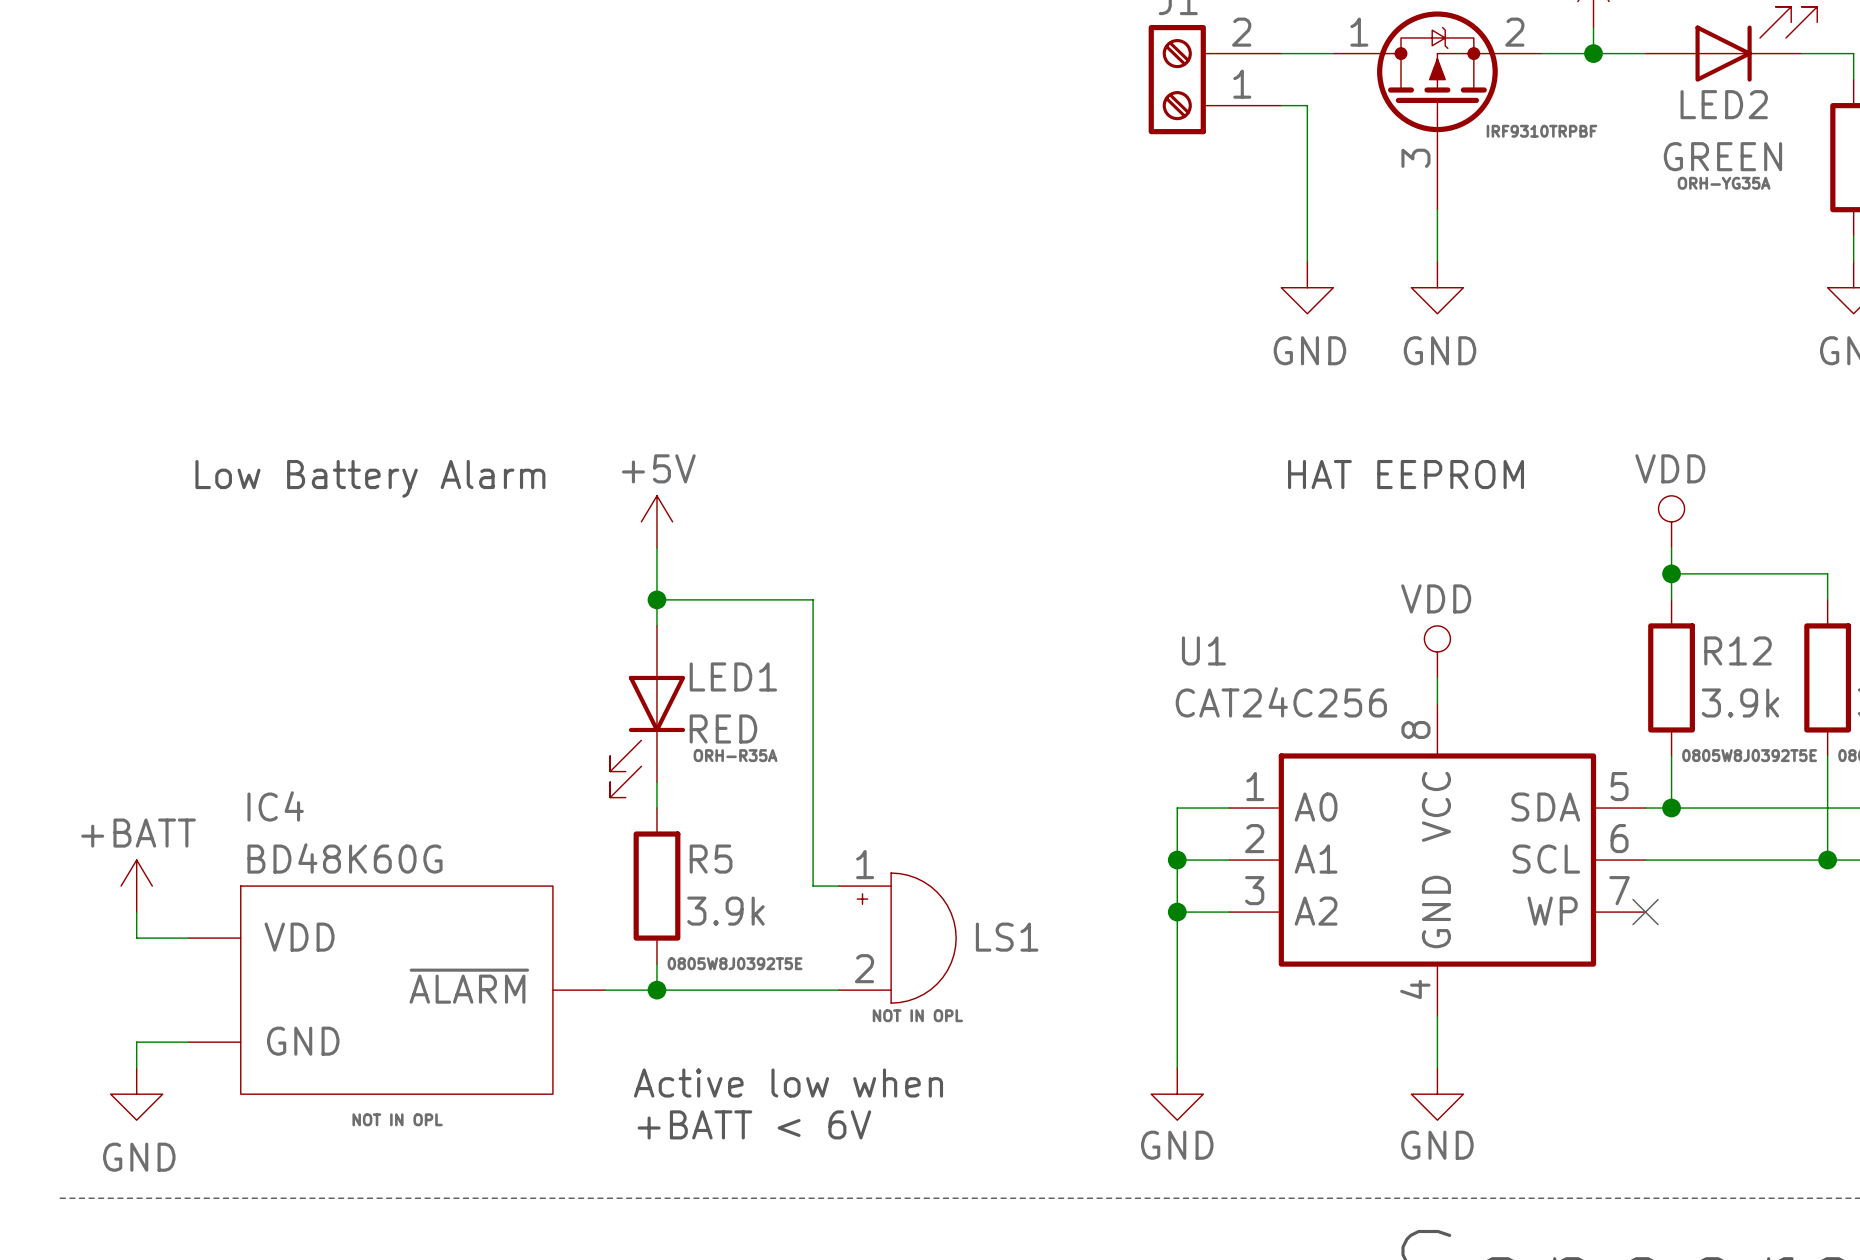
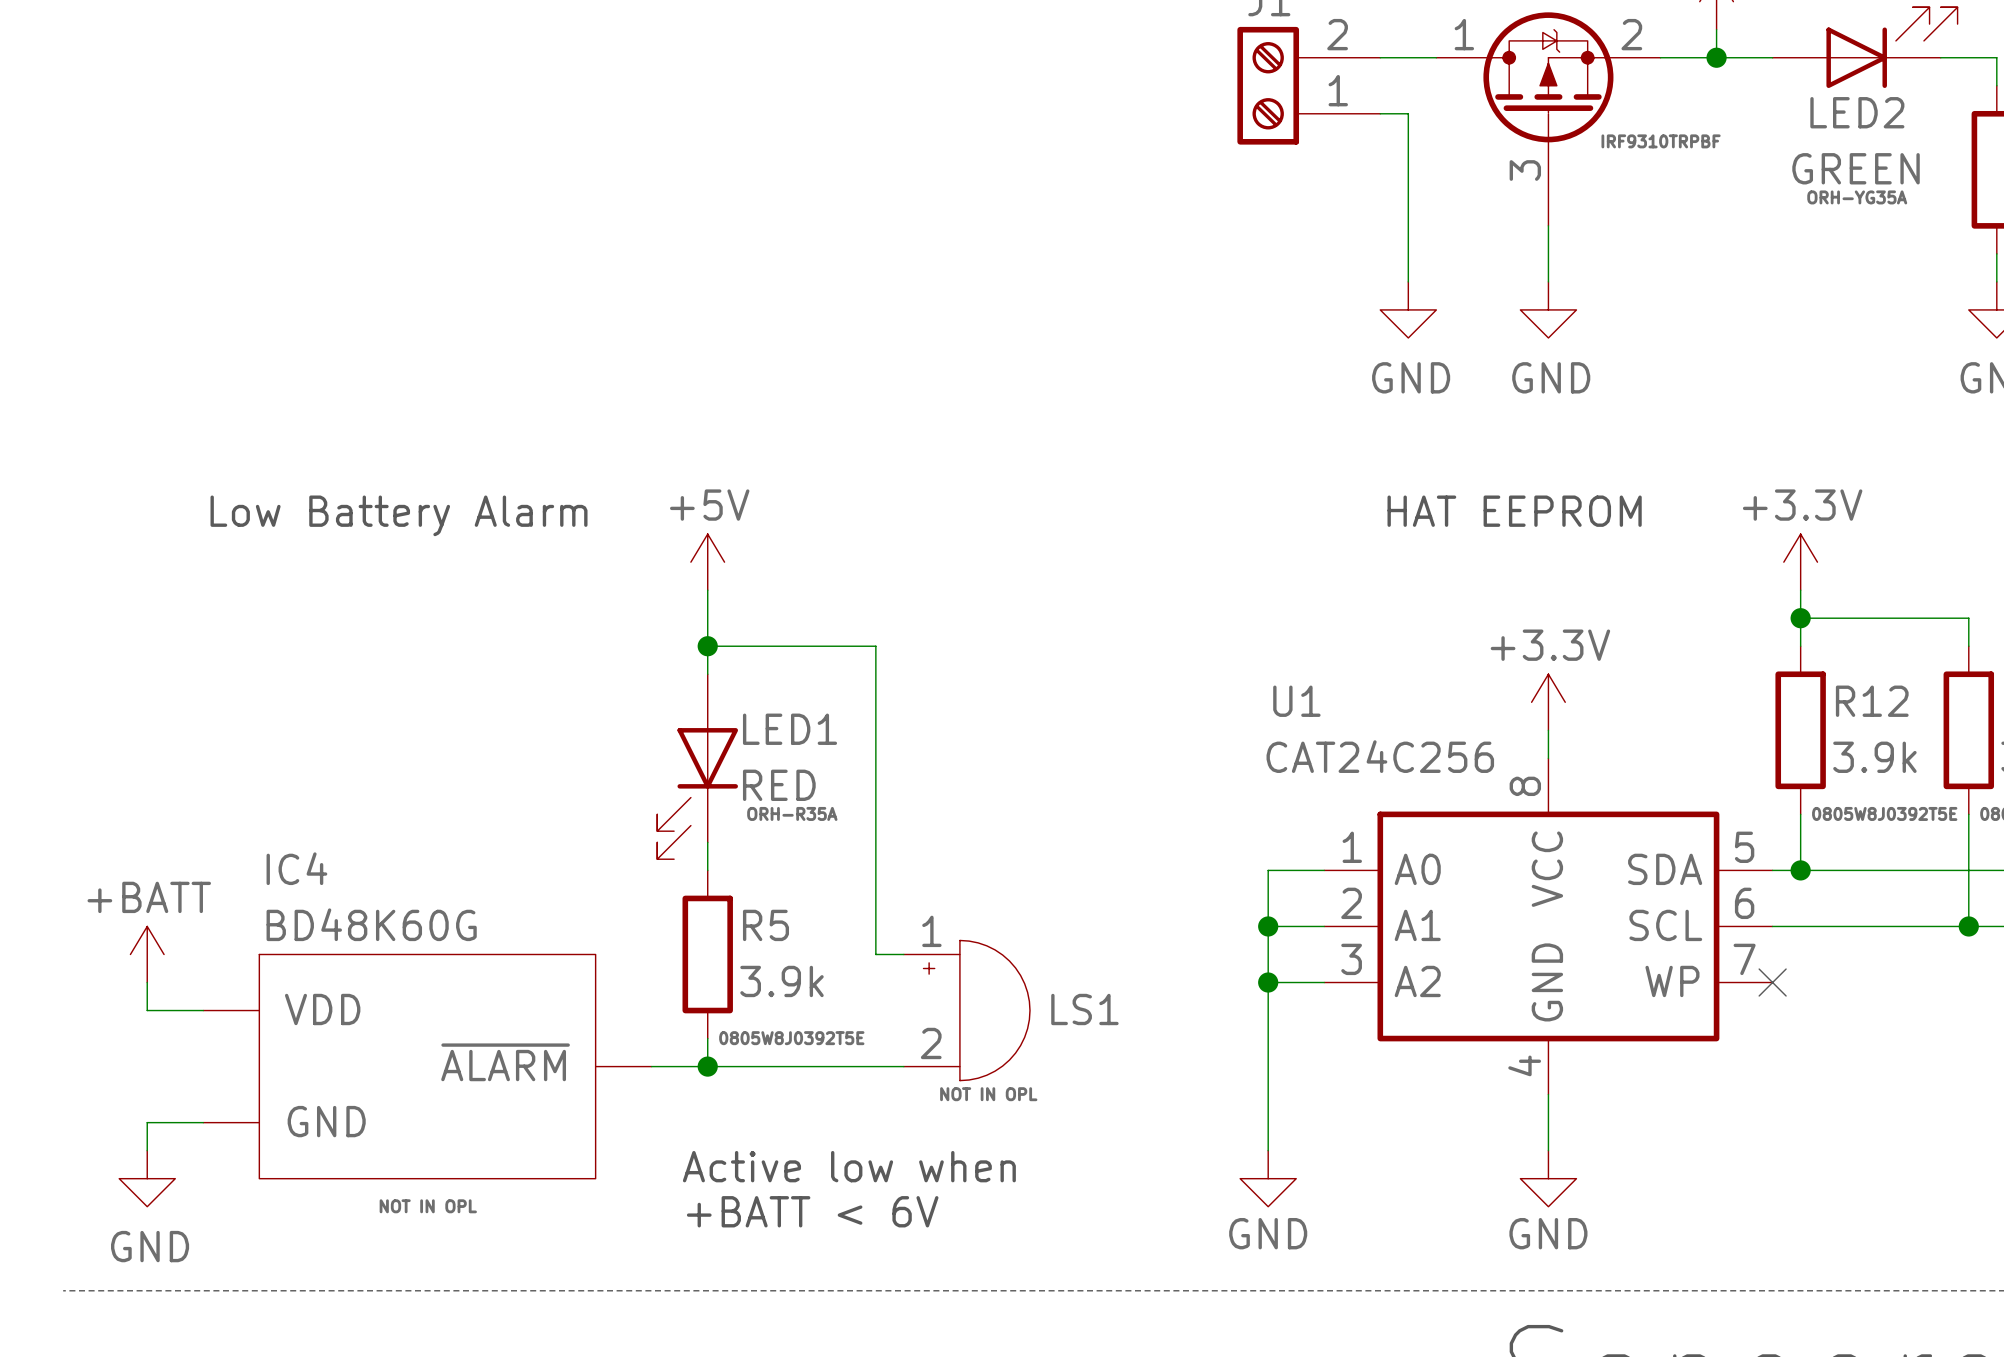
power symbol: VDD (1671, 521) -> +3.3V (1800, 562)
power symbol: VDD (1437, 651) -> +3.3V (1548, 702)

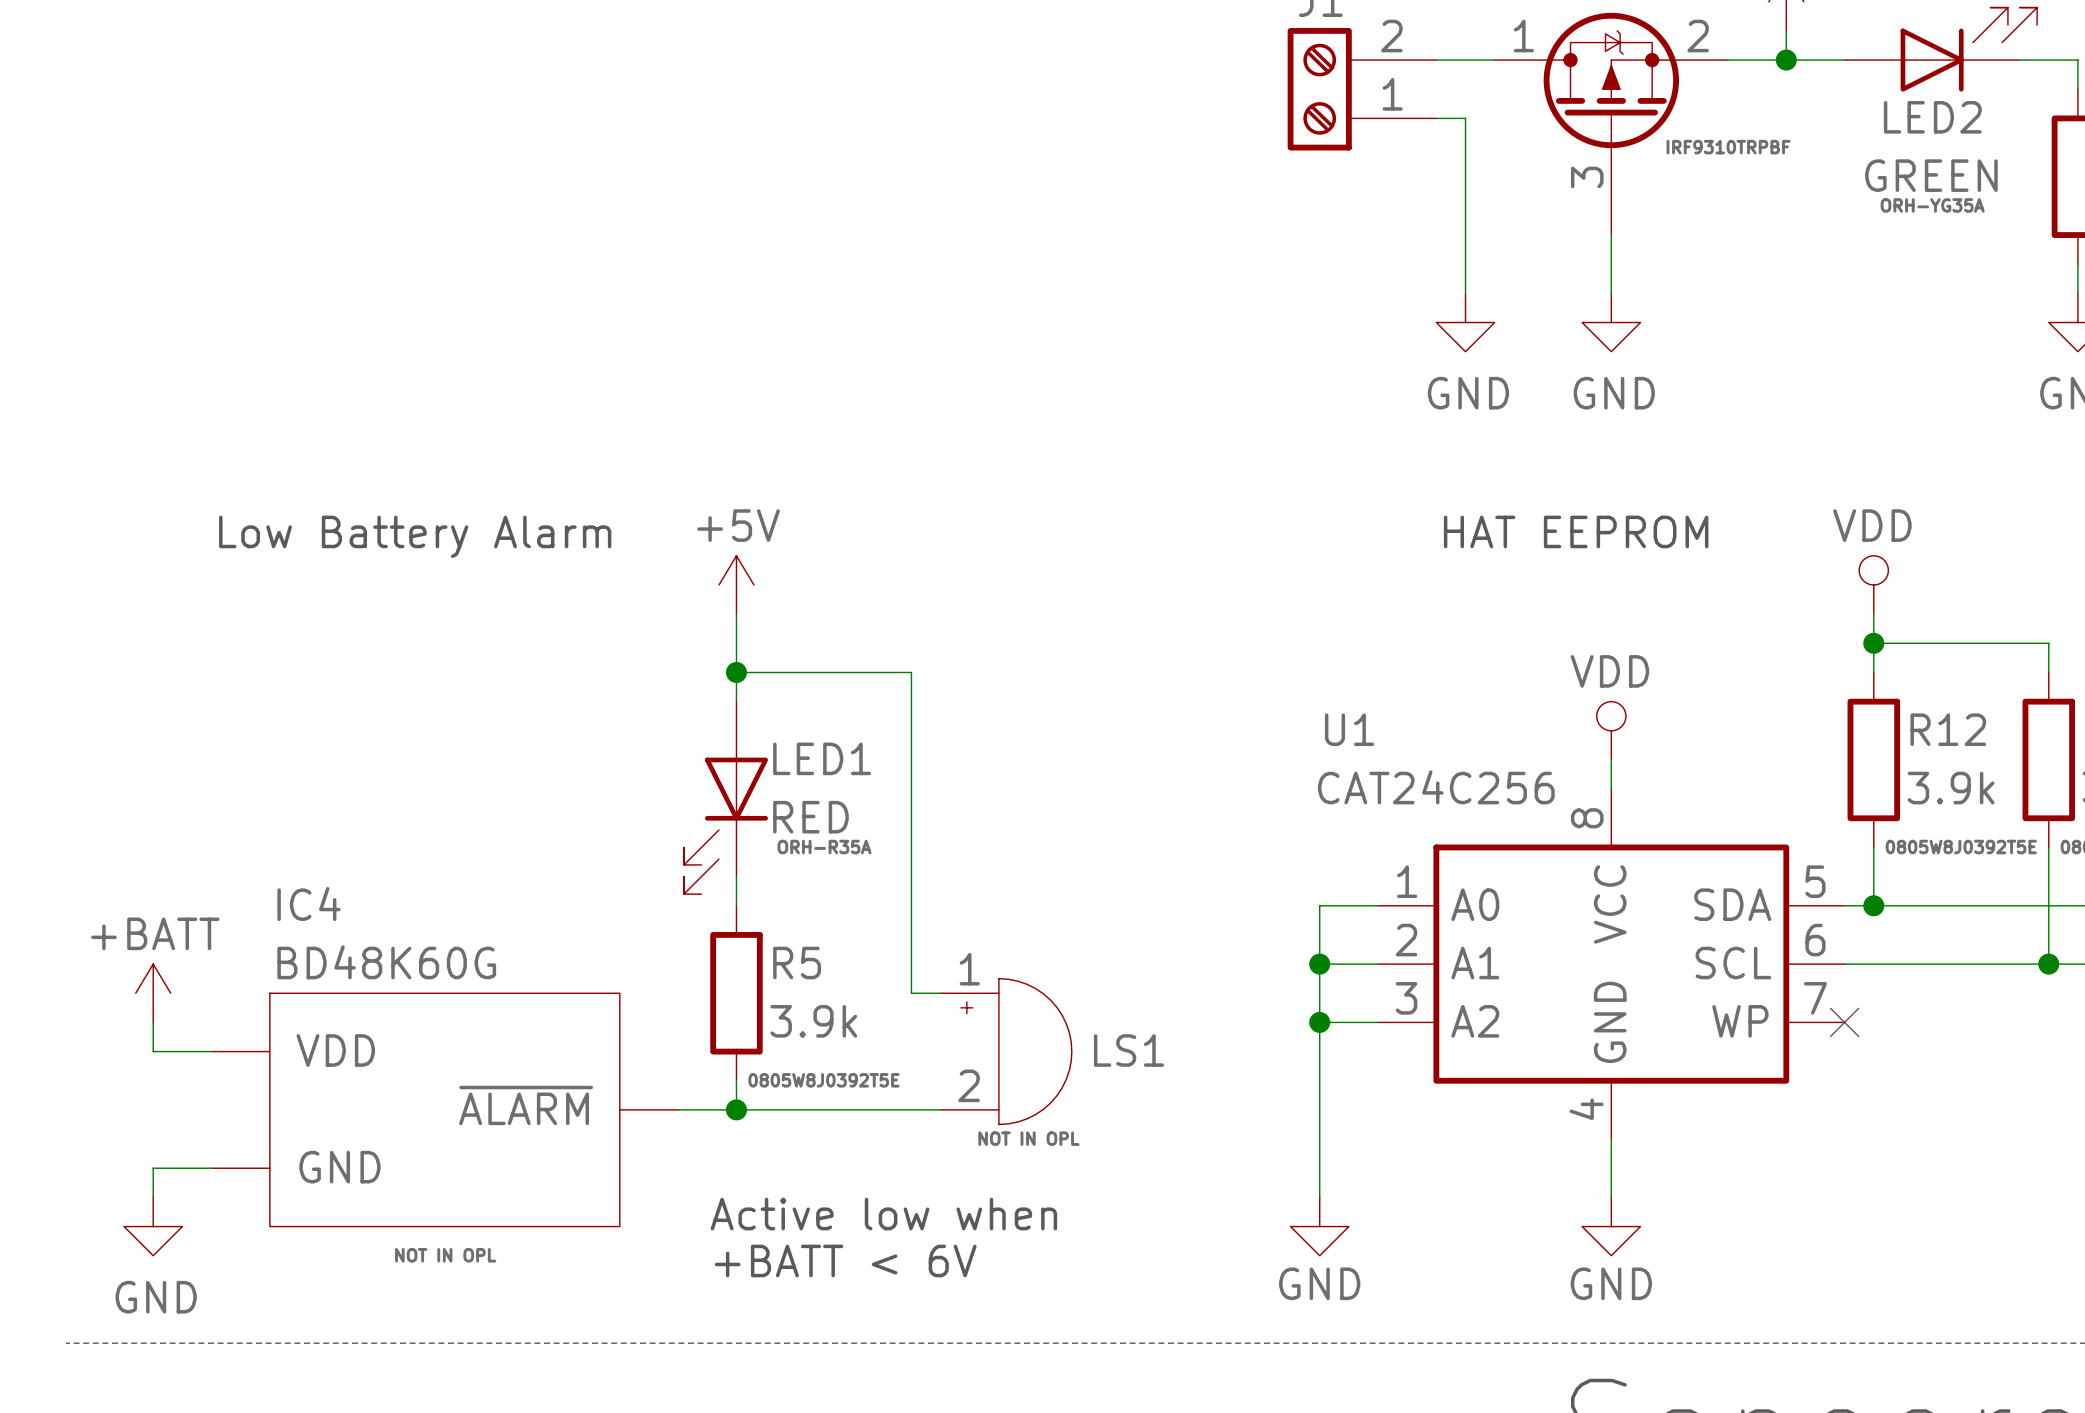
power symbol: +3.3V (1800, 562) -> VDD (1873, 584)
power symbol: +3.3V (1548, 702) -> VDD (1611, 730)

